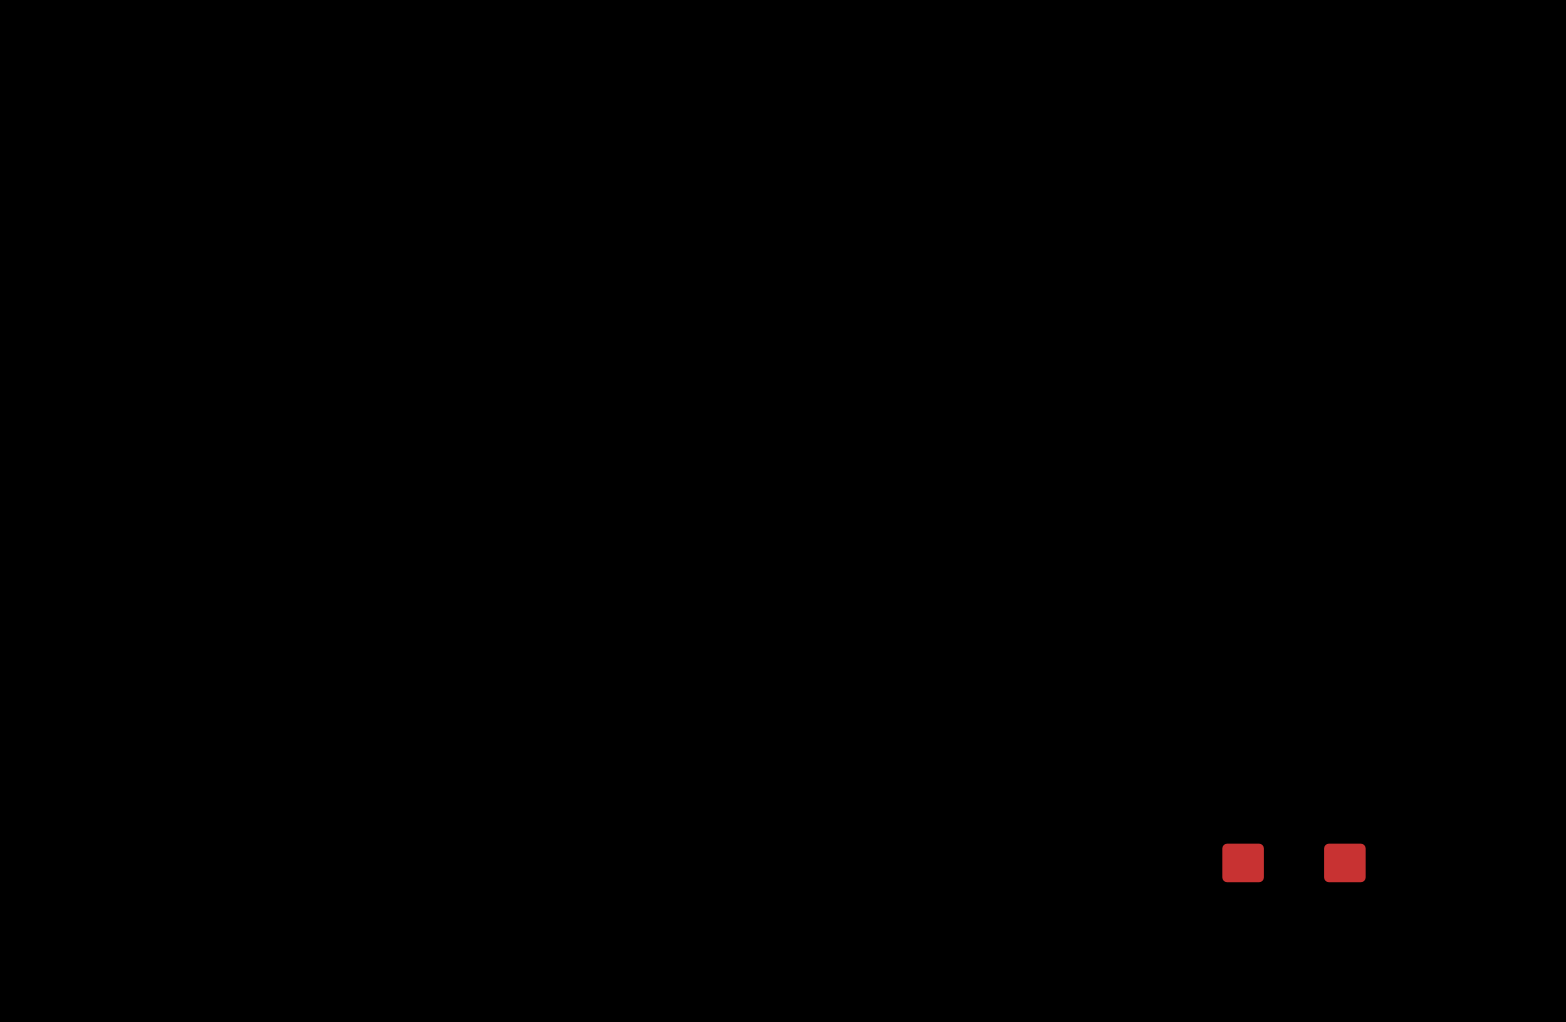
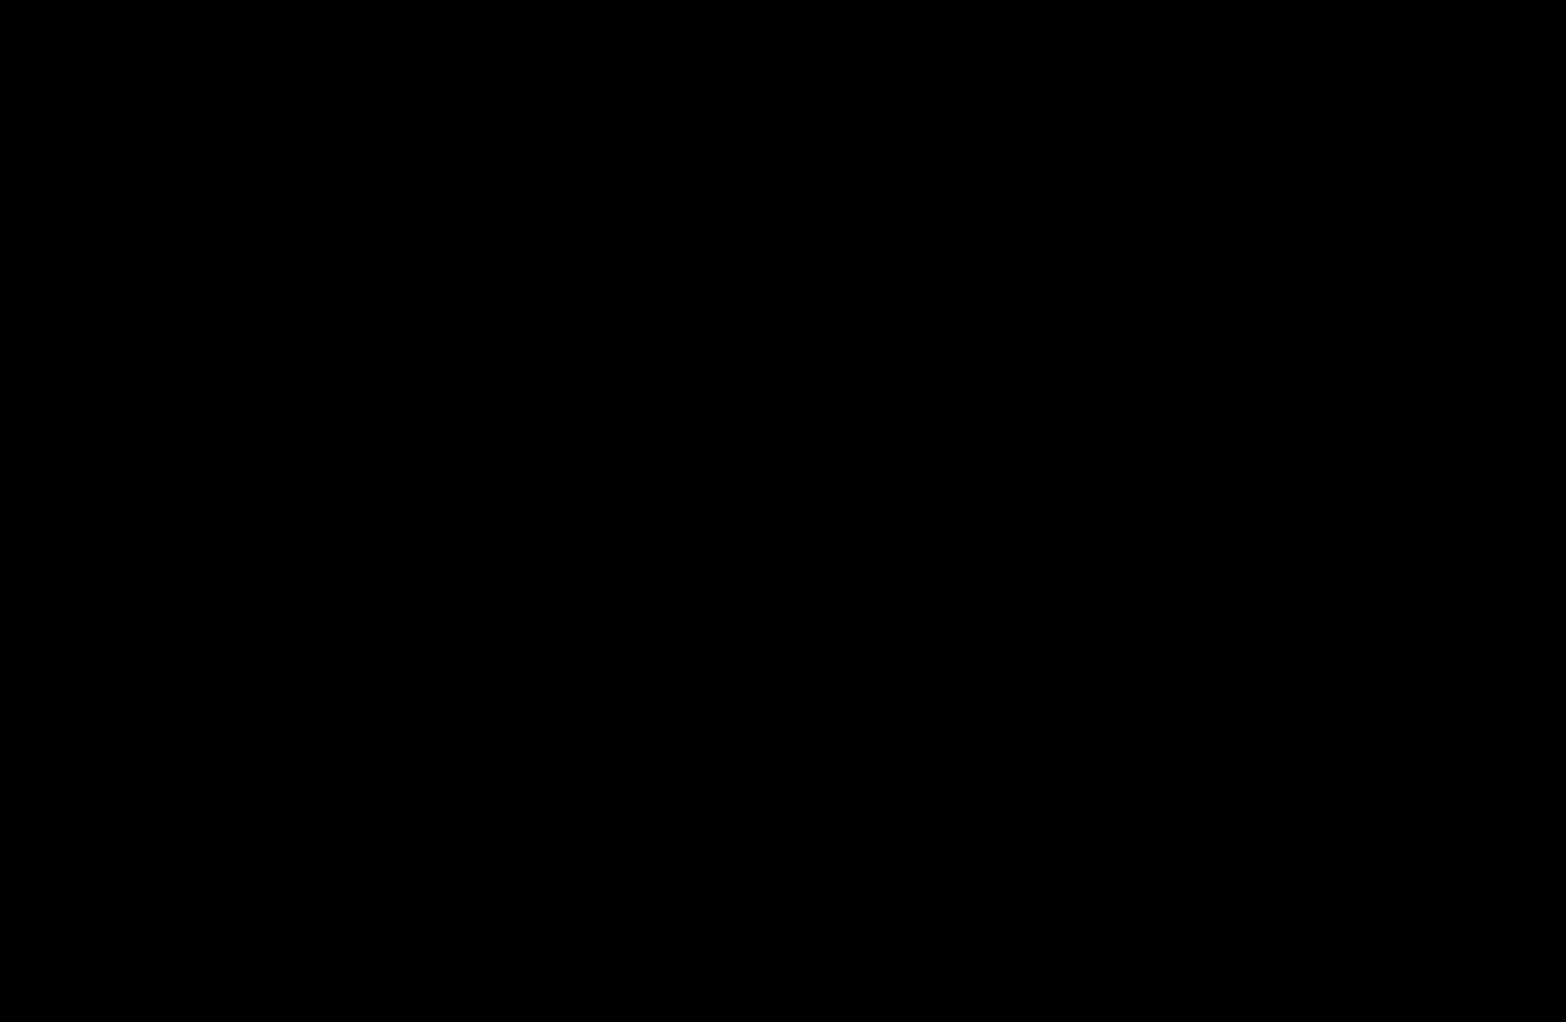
part: (1293, 862) -> none

